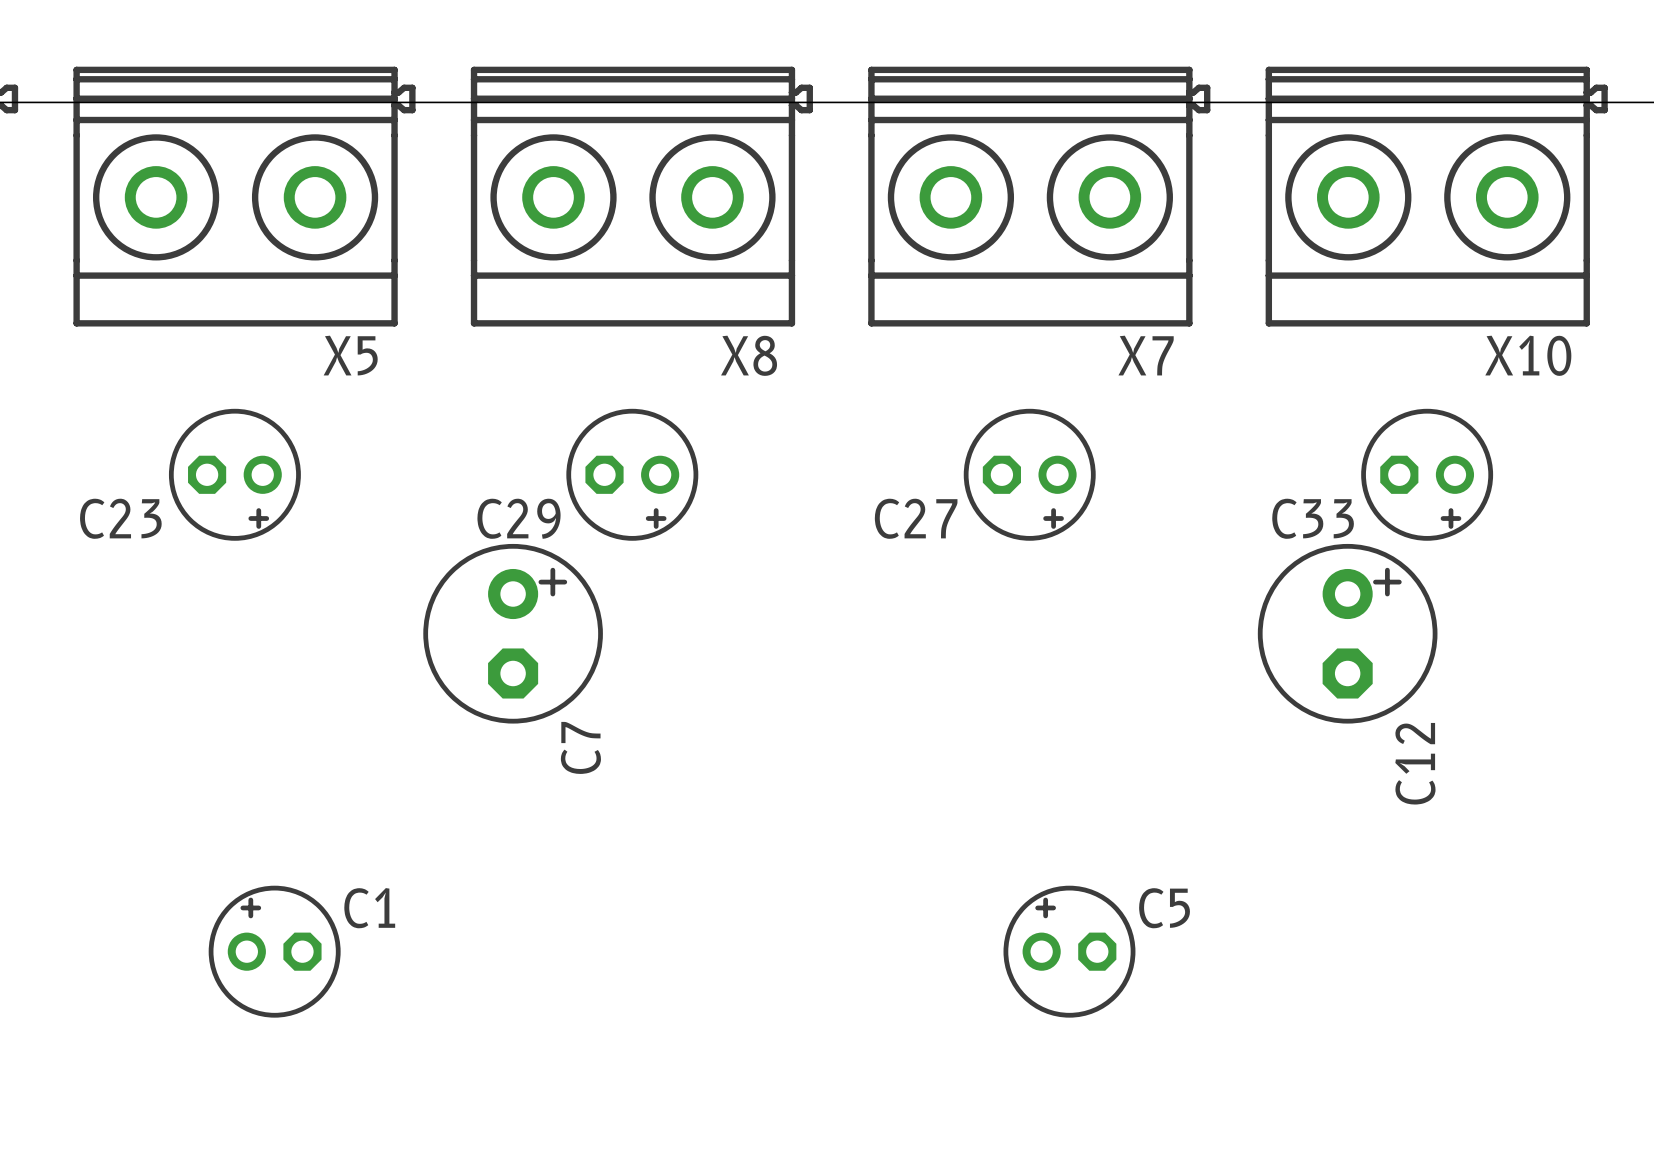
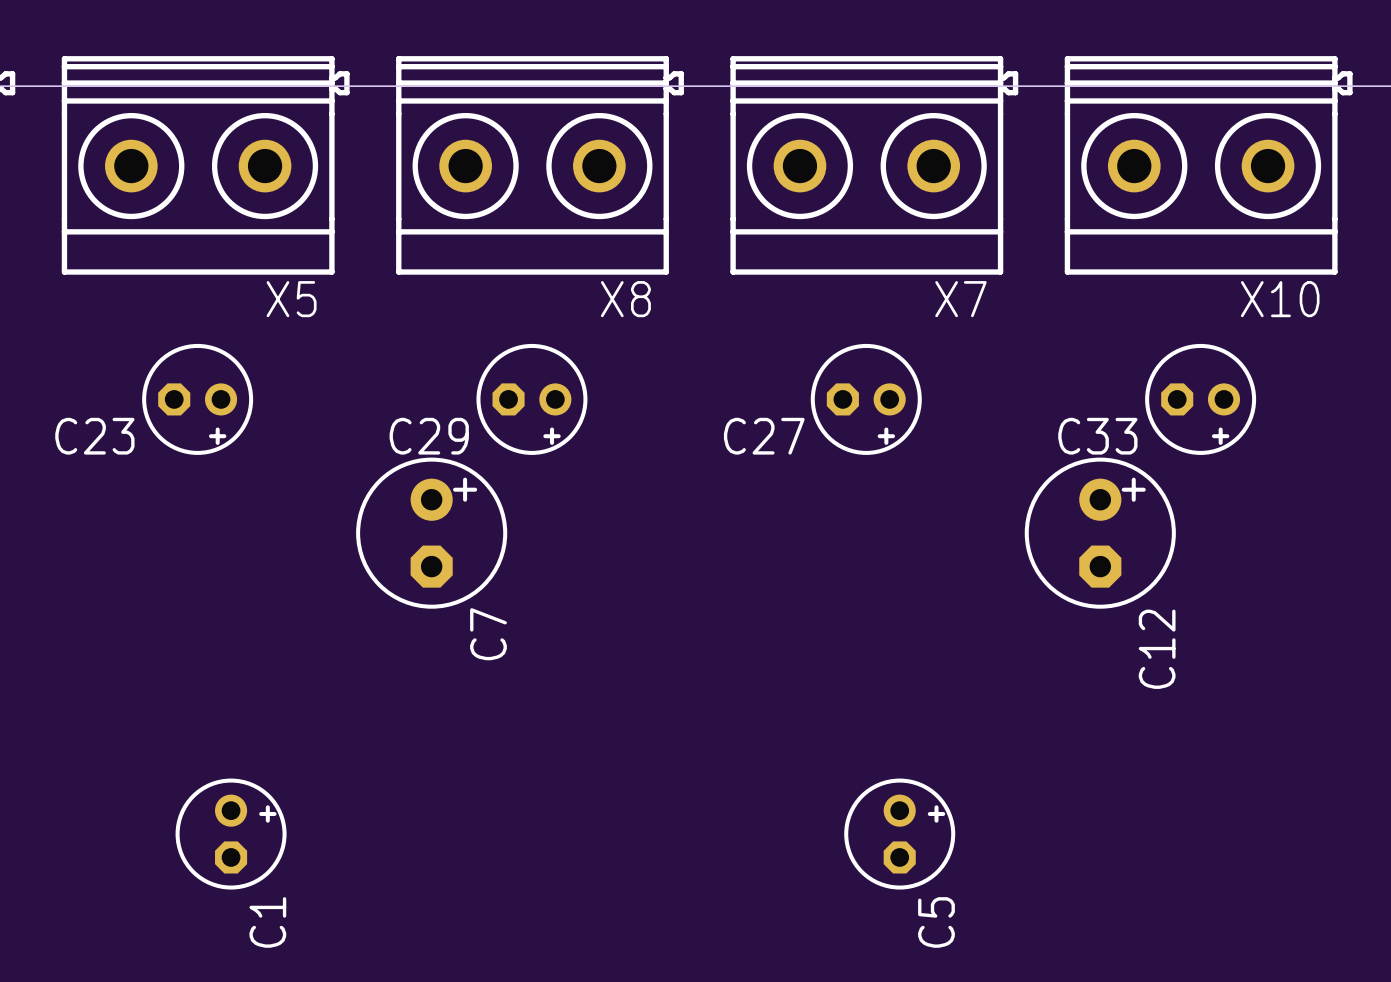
C12 position: (1347, 633) -> (1100, 533)
C1 rotation: 0° (274, 951) -> 90° clockwise (231, 834)
C5 rotation: 0° (1069, 951) -> 90° clockwise (899, 834)

